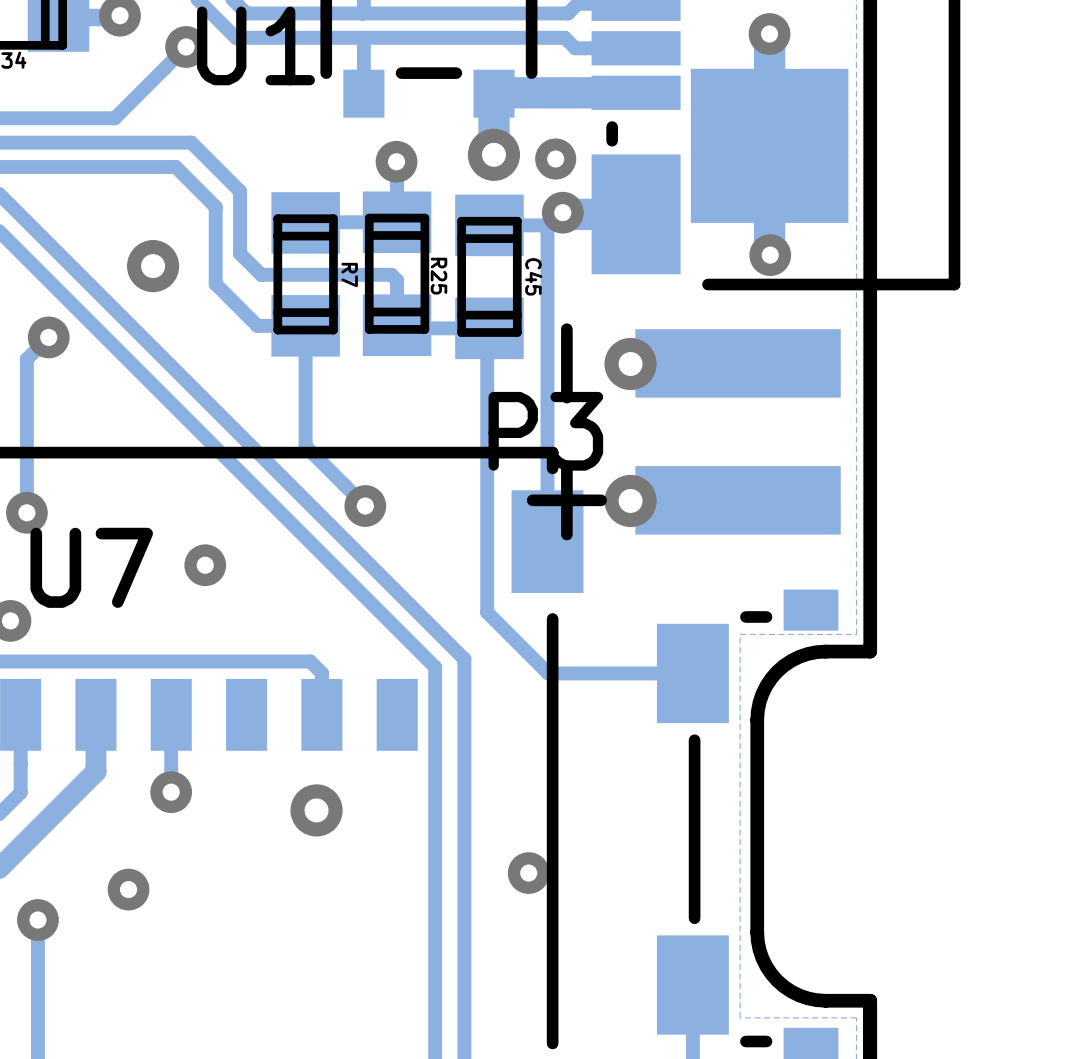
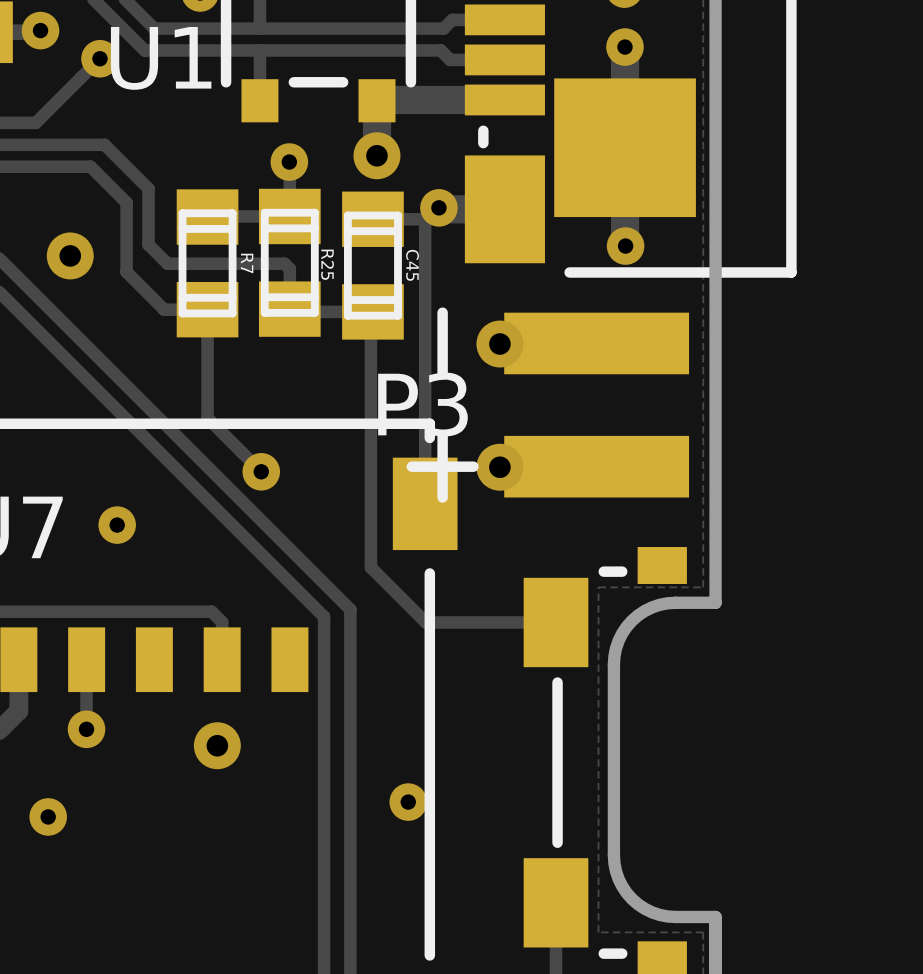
via: (555, 159) -> none

